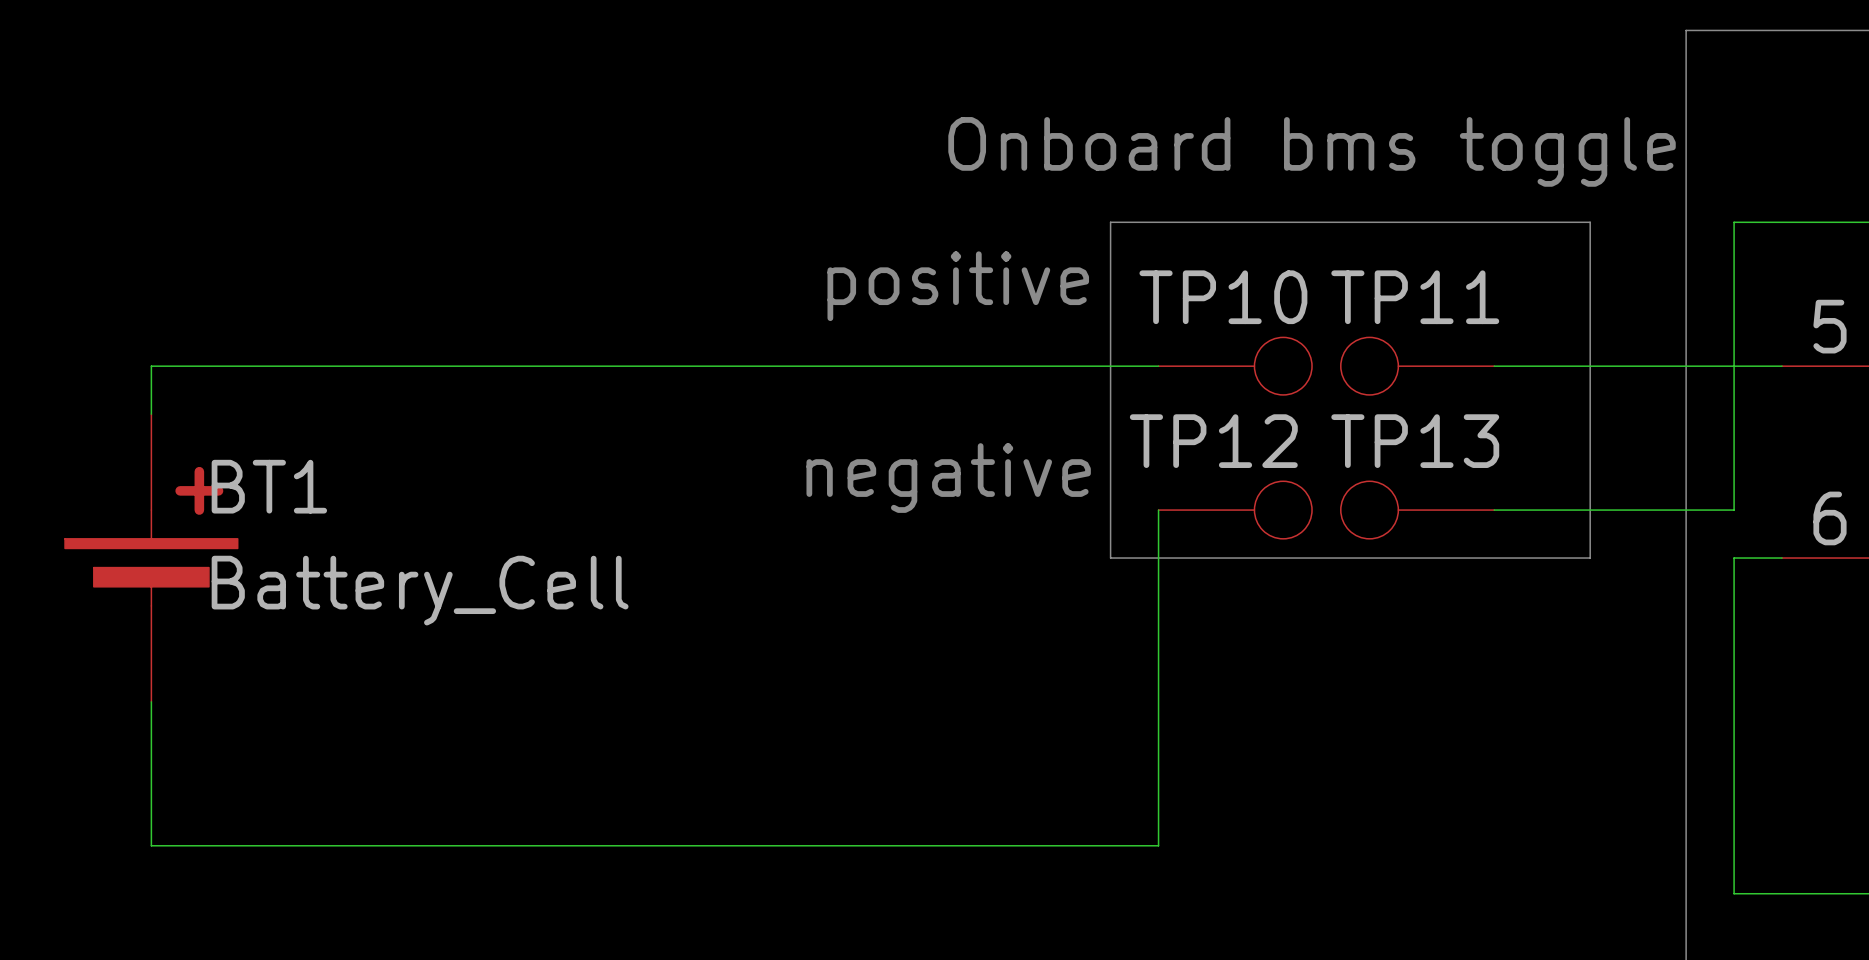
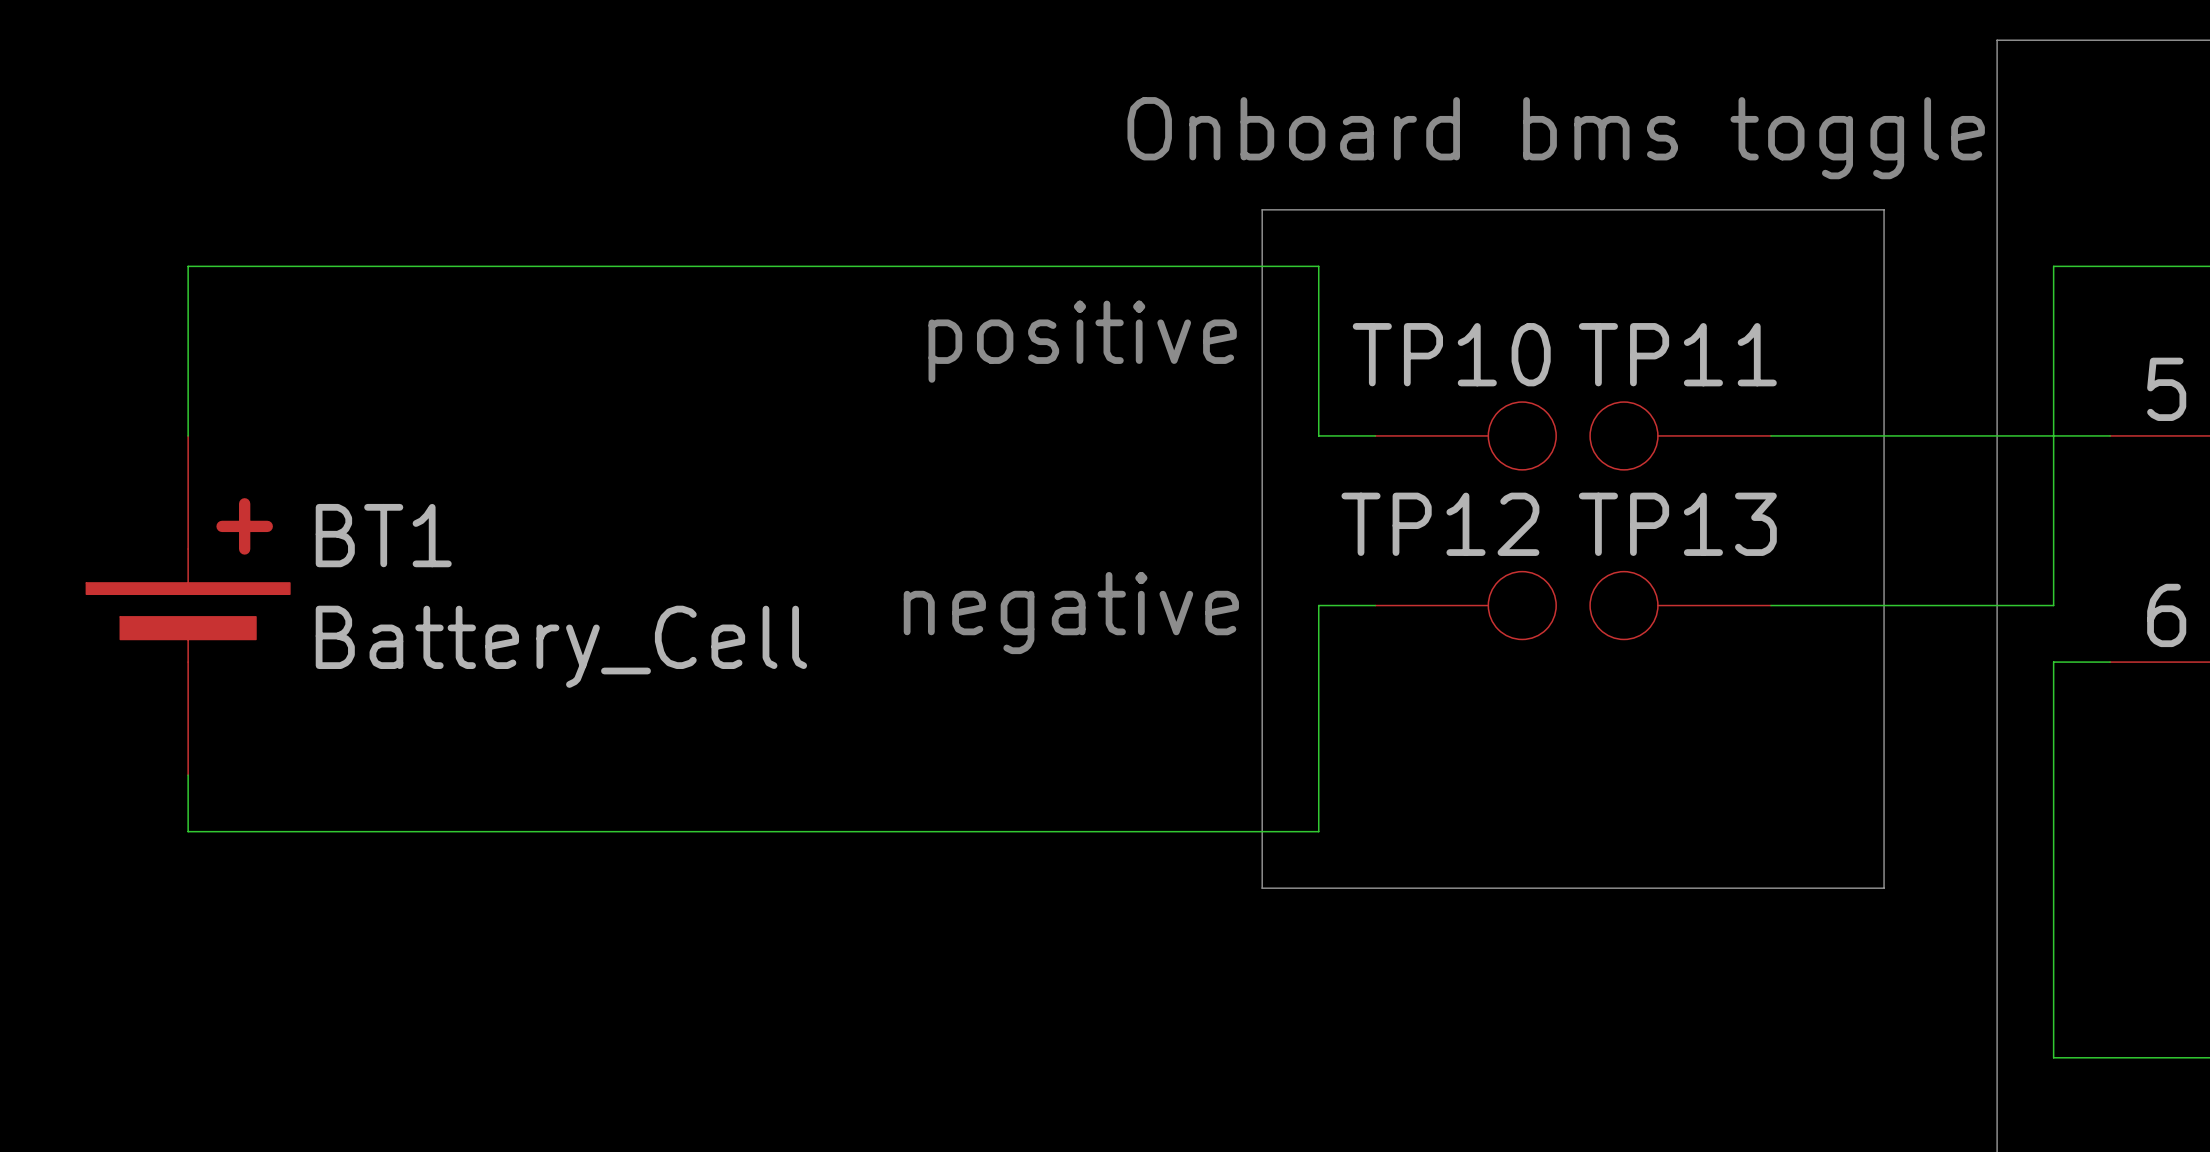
text position: Onboard bms toggle (1312, 151) -> Onboard bms toggle (1556, 138)
line: (1590, 222) (1110, 222) (1110, 558) (1590, 558) -> (1884, 266) (1884, 209) (1262, 209) (1262, 888) (1884, 888) (1884, 662)
text position: positive (958, 286) -> positive (1082, 341)
wire: (1110, 366) (151, 366) (151, 414) -> (1318, 435) (1318, 266) (188, 266) (188, 435)
text position: negative (948, 478) -> negative (1071, 613)
BT1 name position: BT1 (269, 486) -> BT1 (383, 535)
wire: (1158, 510) (1158, 845) (151, 845) (151, 701) -> (1375, 605) (1318, 605) (1318, 831) (188, 831) (188, 775)
BT1 position: (151, 558) -> (188, 605)
BT1 value position: Battery_Cell (420, 590) -> Battery_Cell (561, 646)

